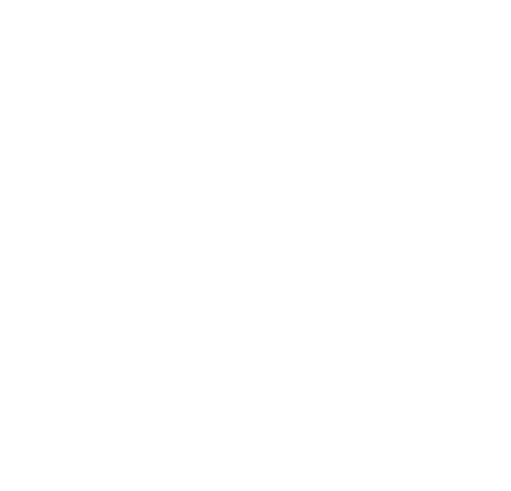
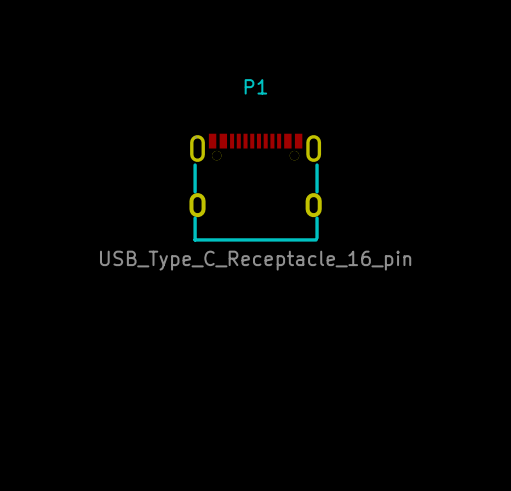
P1: none -> USB_Type_C_Receptacle_16_pin (255, 187)

